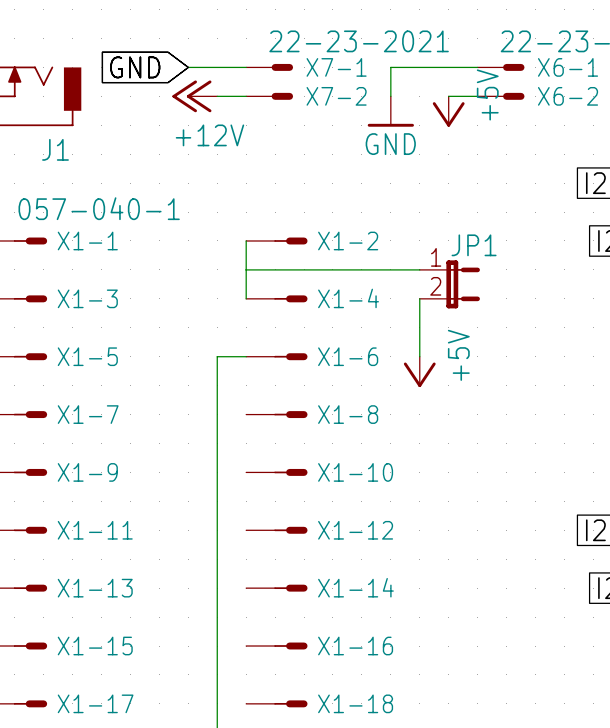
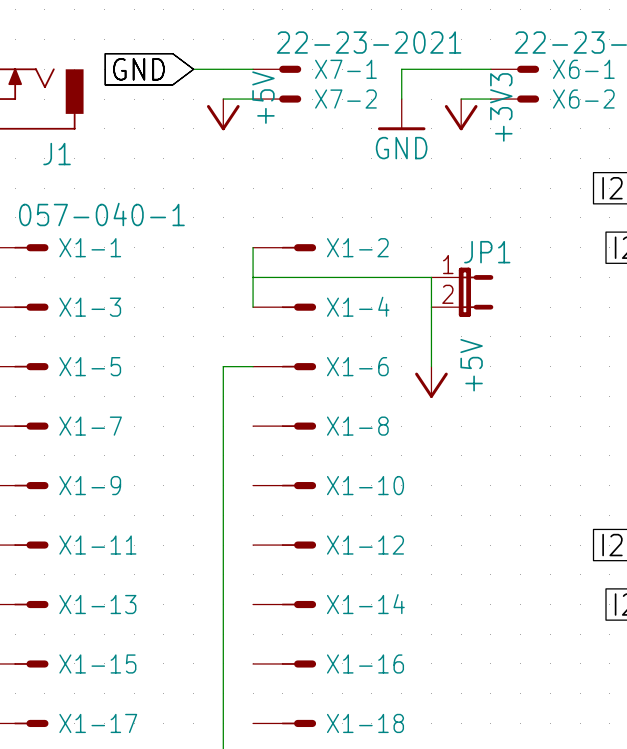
power symbol: +12V (194, 96) -> none
power symbol: none -> +5V (223, 114)
power symbol: +5V (448, 111) -> +3V3 (461, 114)
wire: none -> (431, 277) (431, 307)

